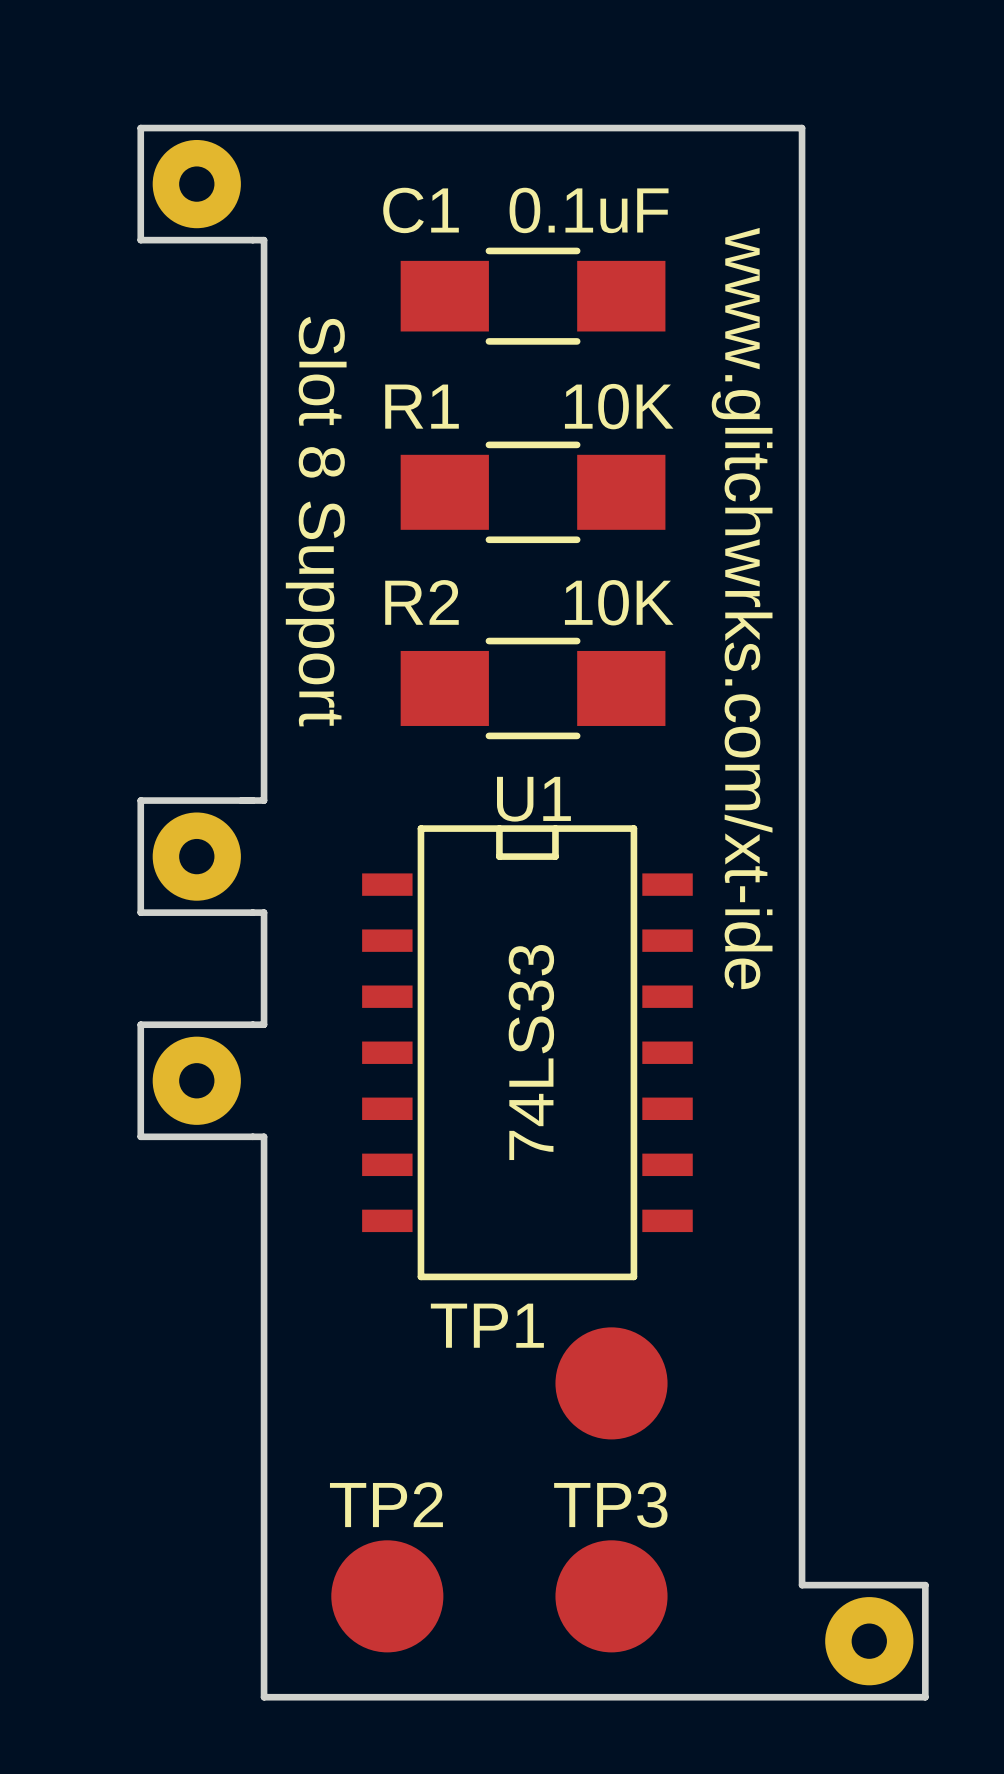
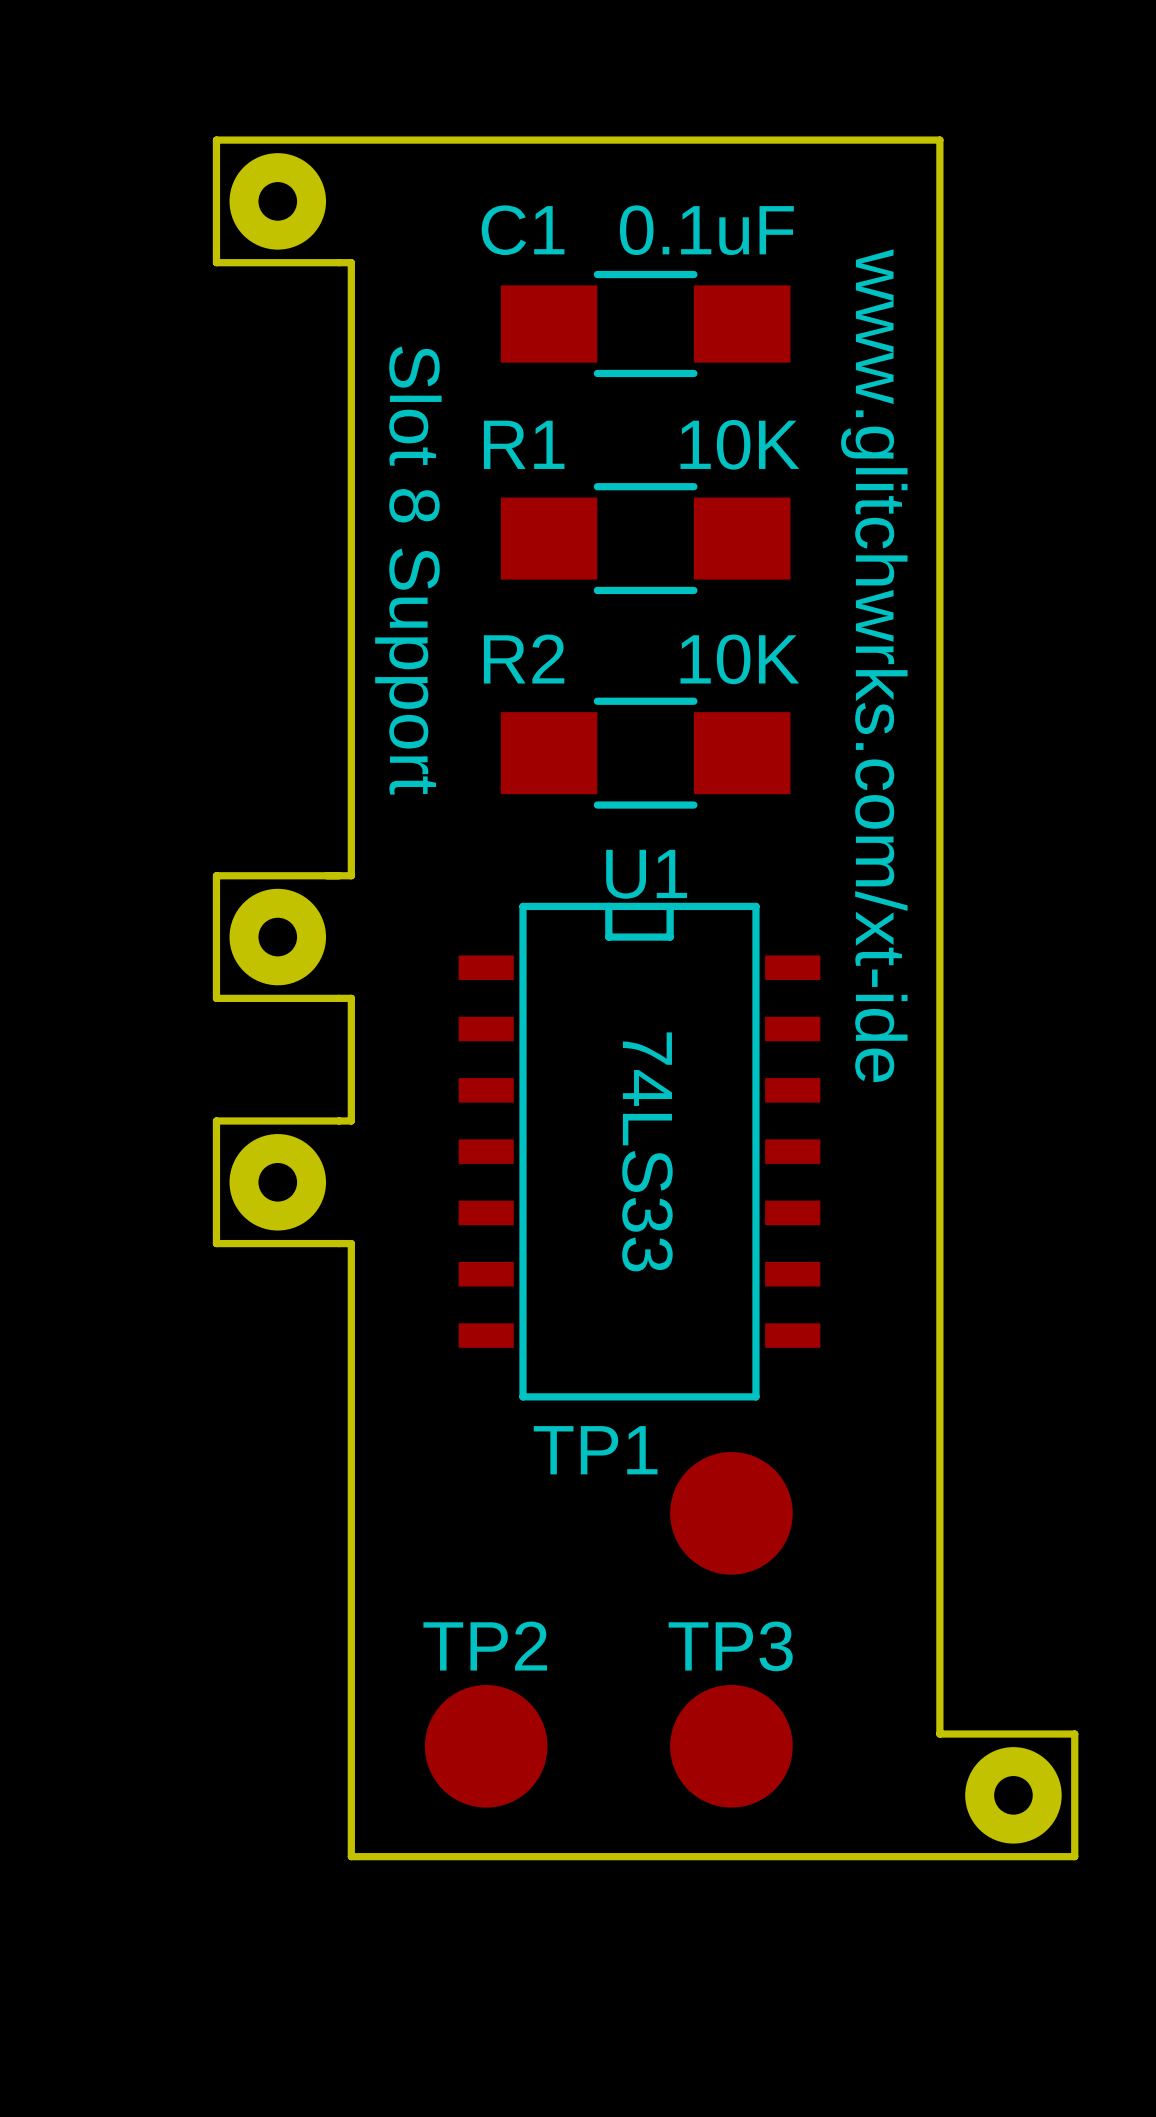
U1 value: 74LS33 (531, 1052) -> none
text: none -> 74LS33 (647, 1151)

